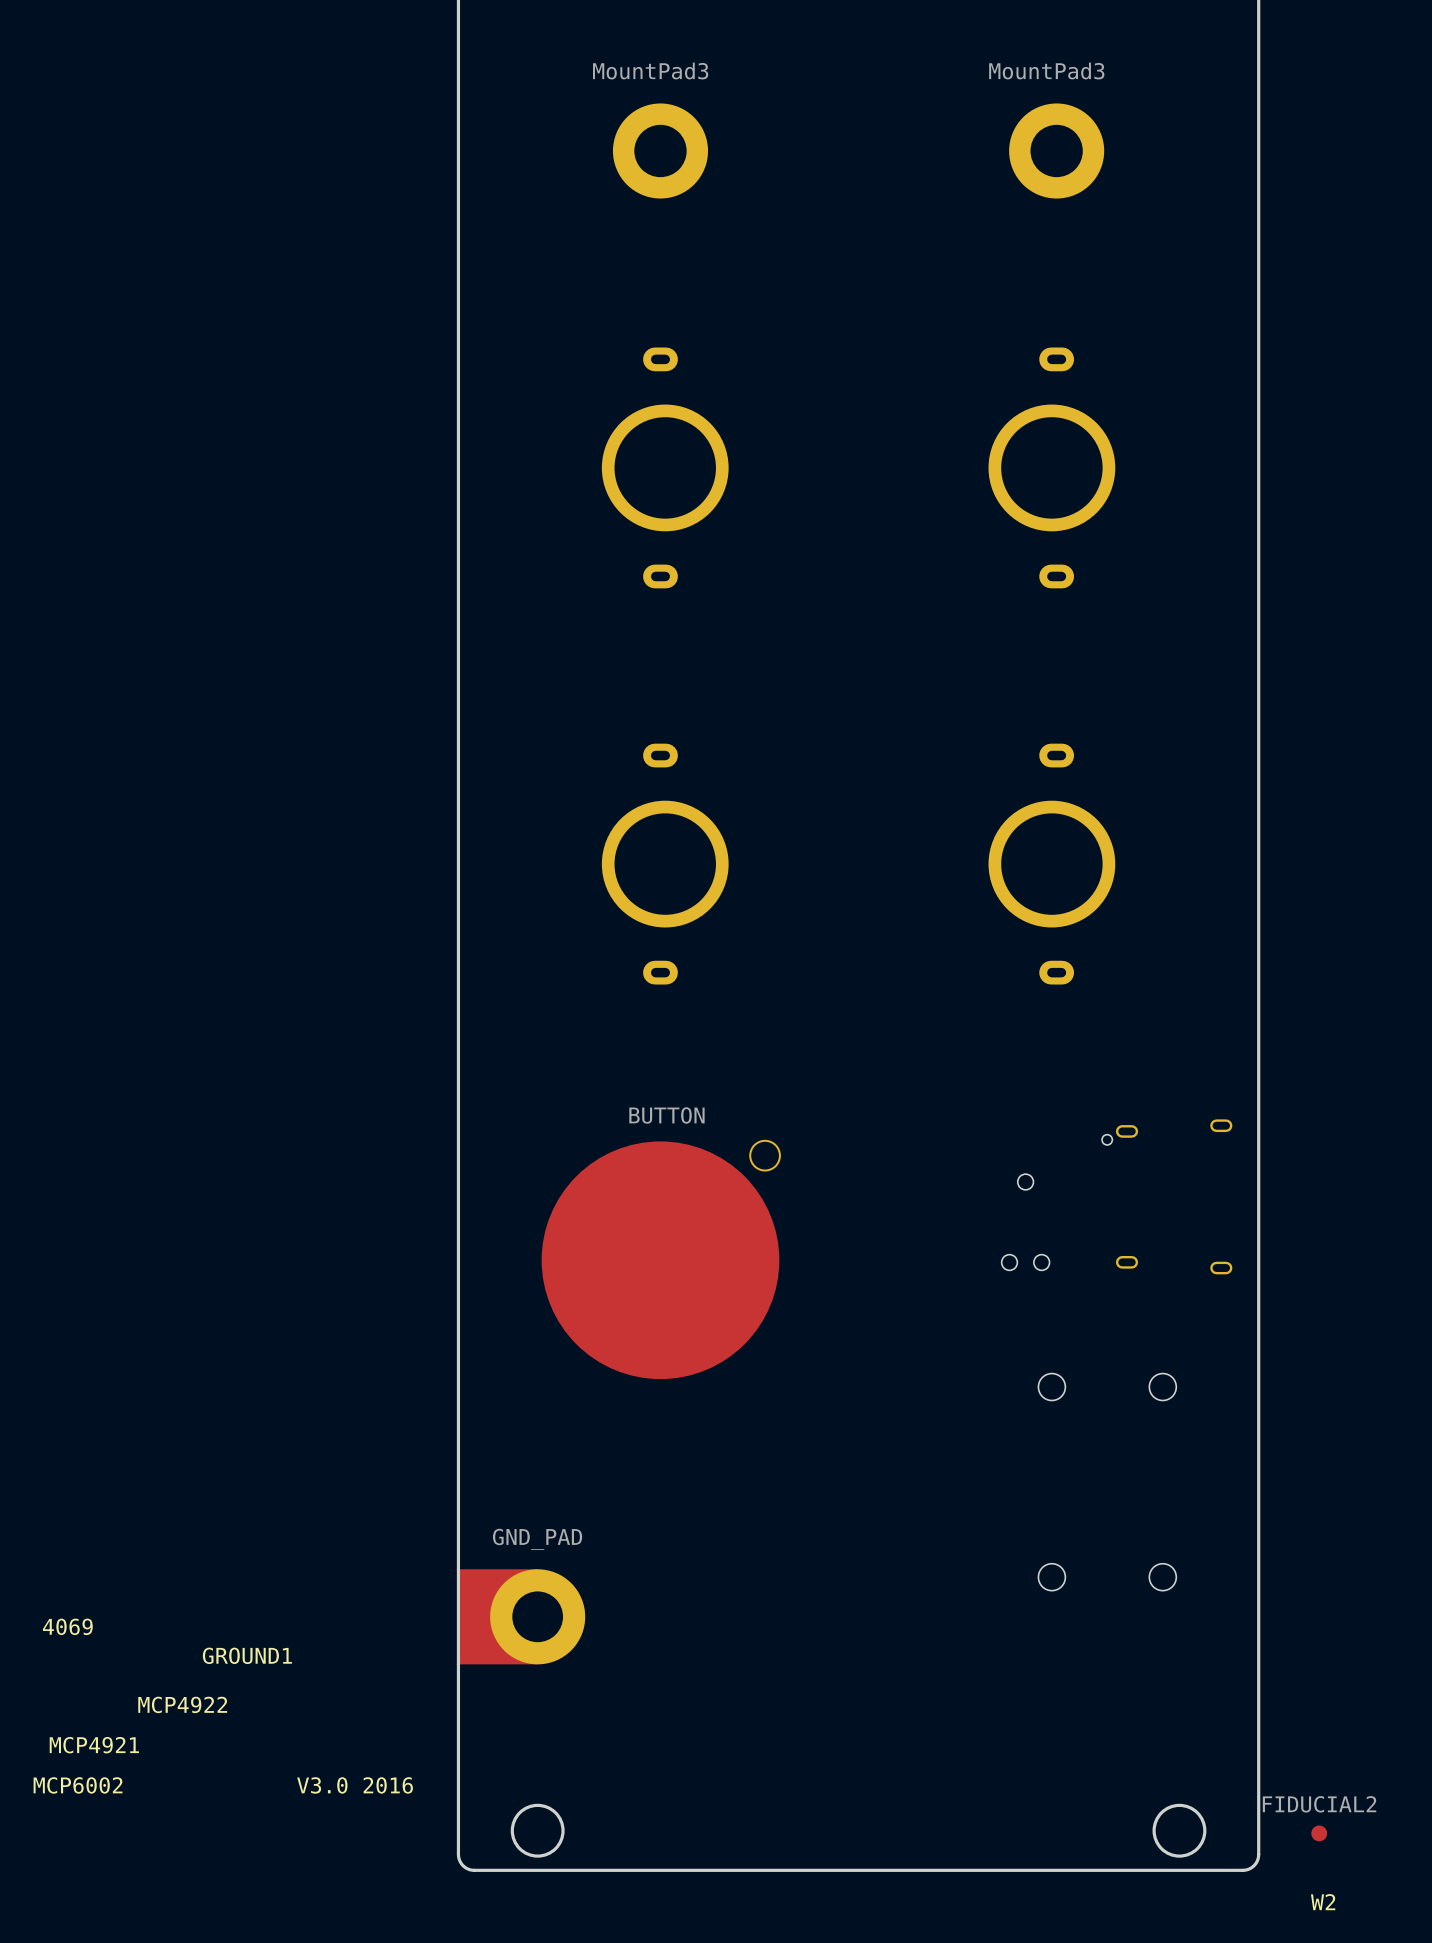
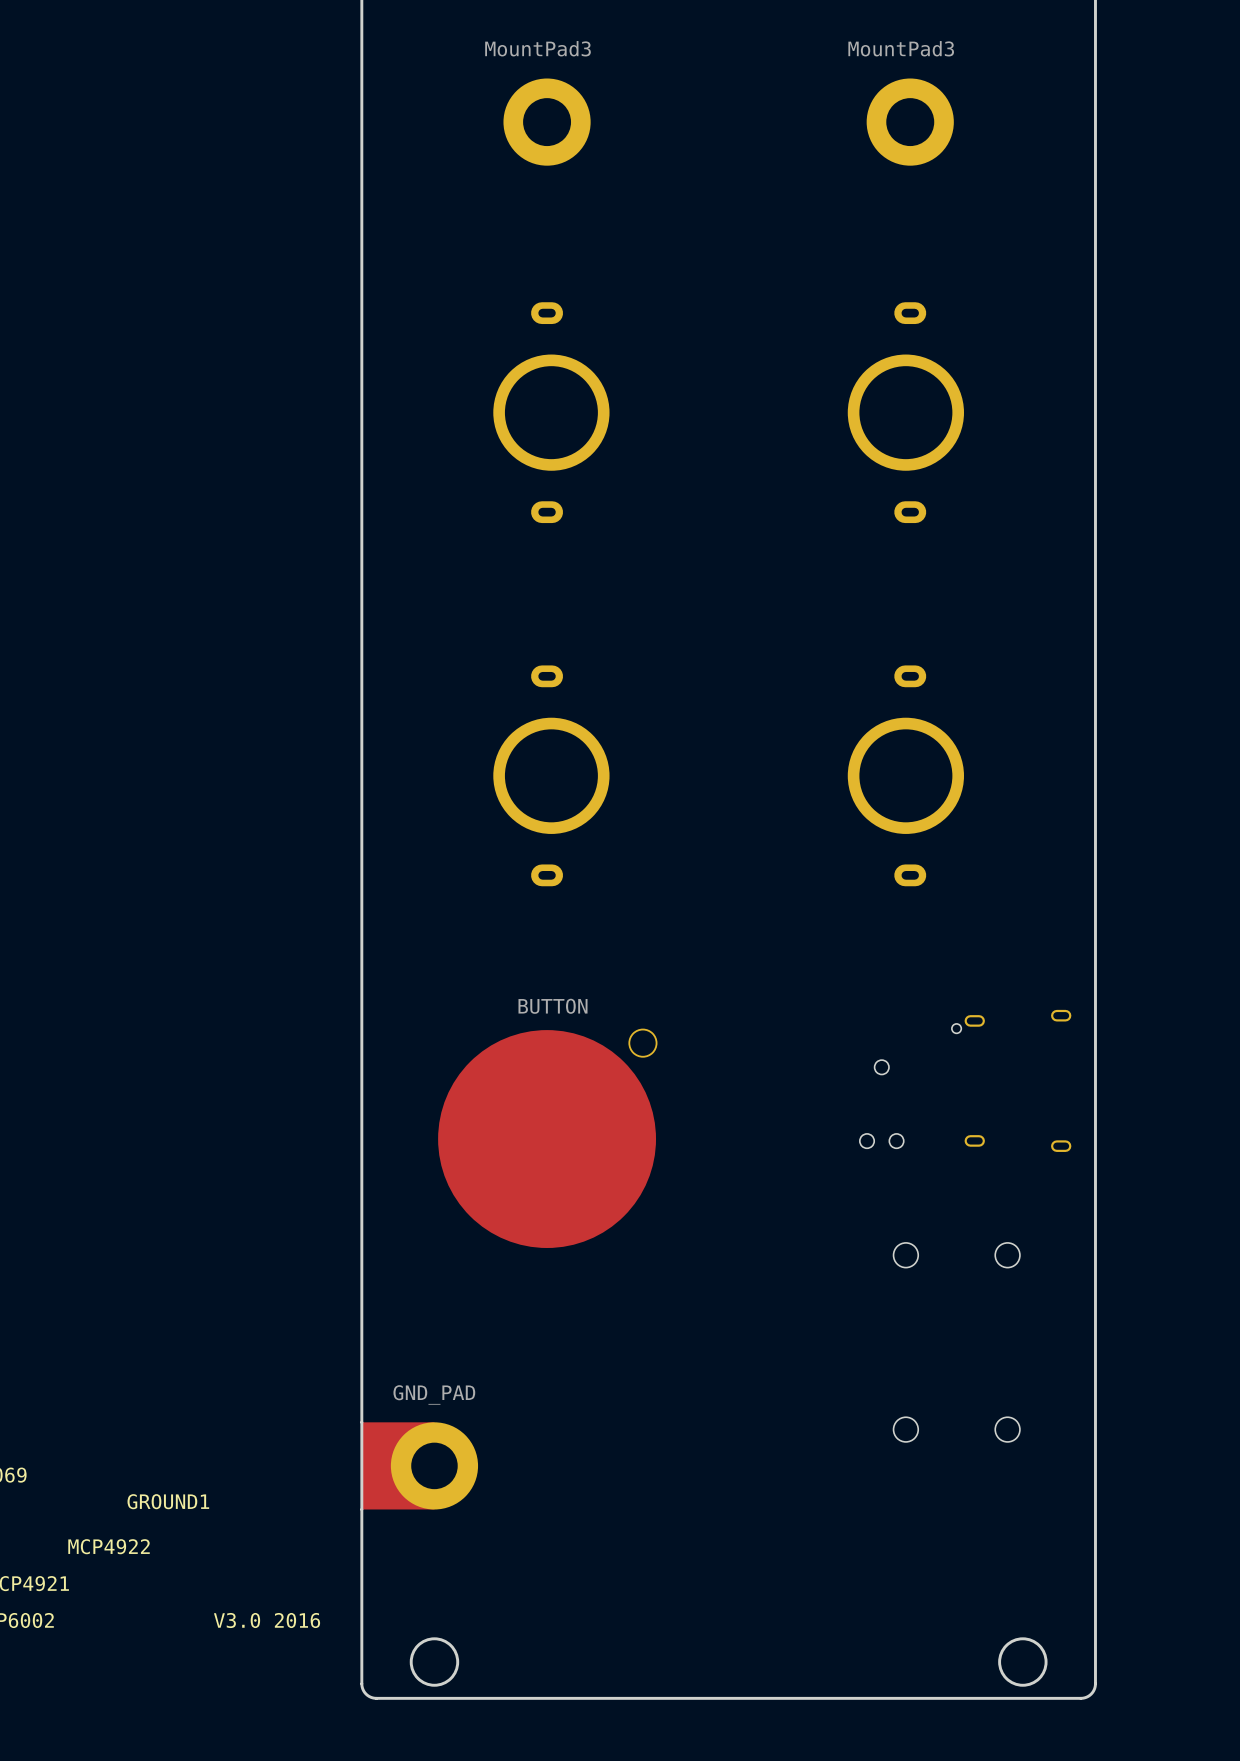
W2: FIDUCIAL2 (1319, 1833) -> none

